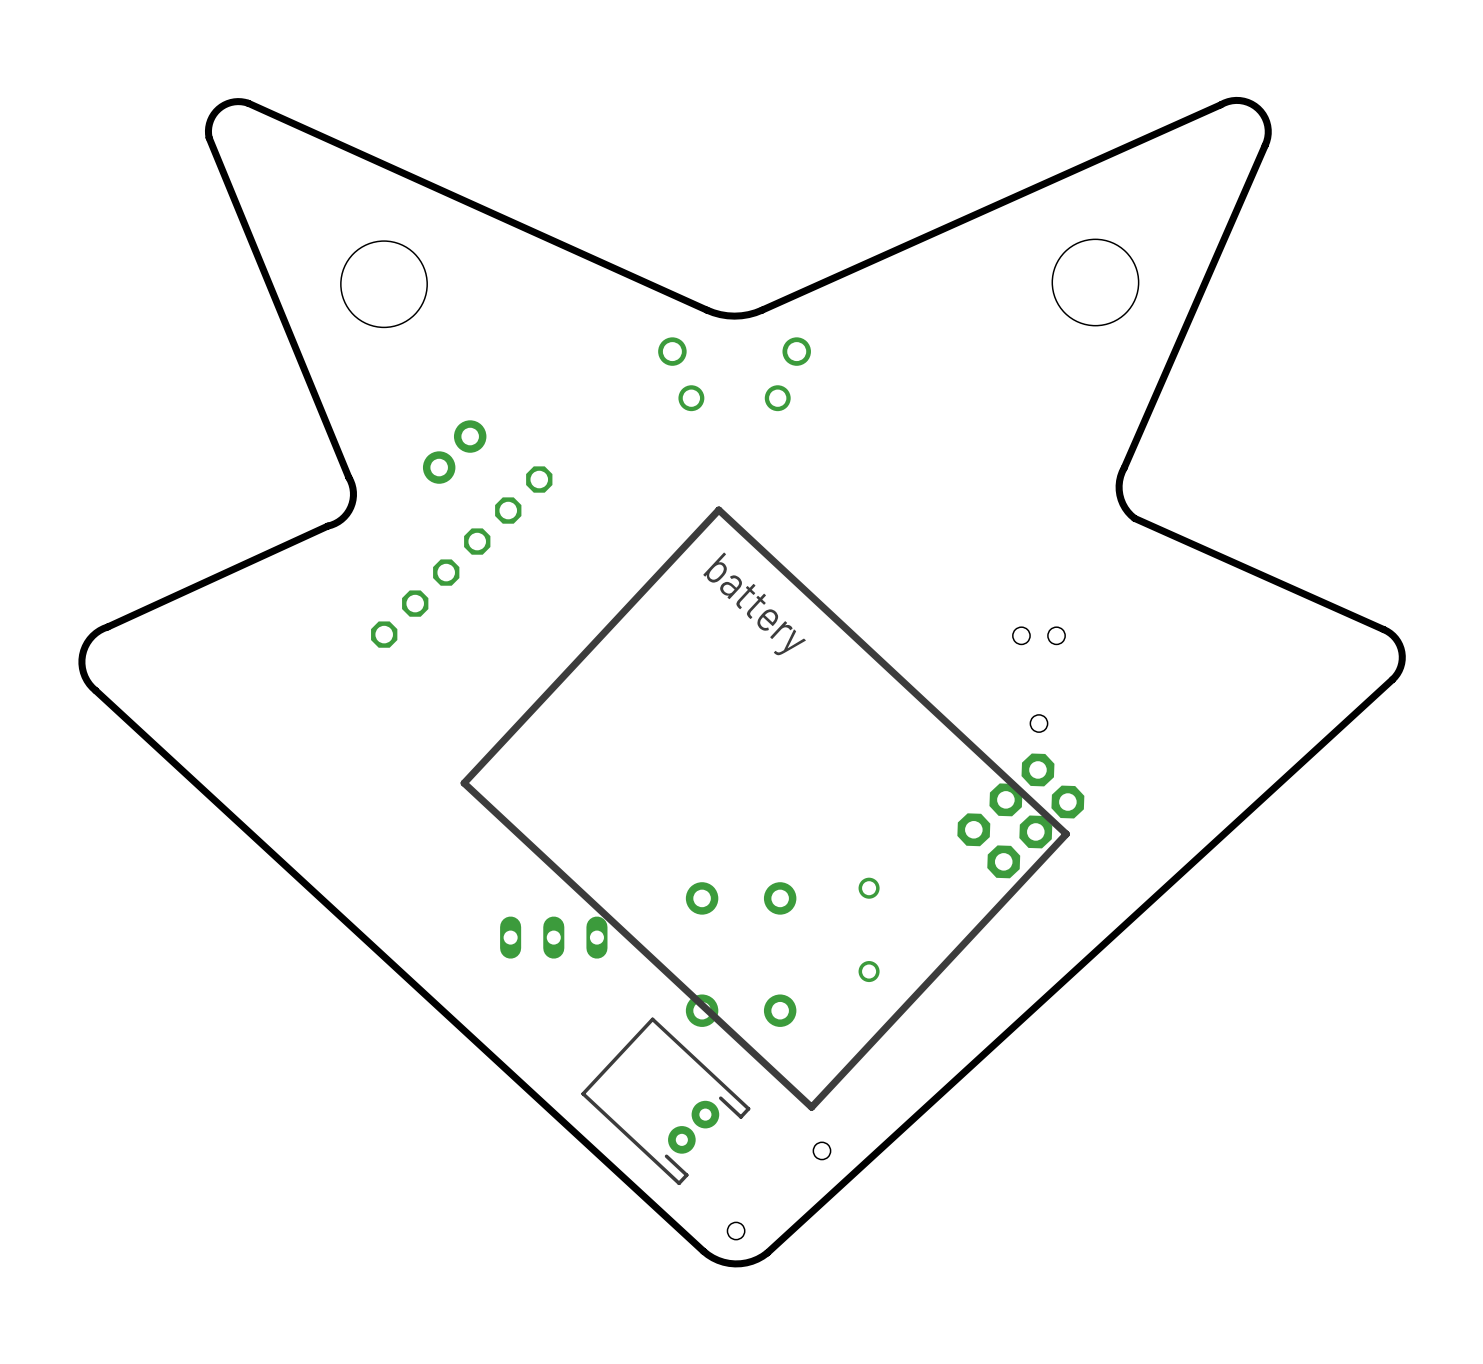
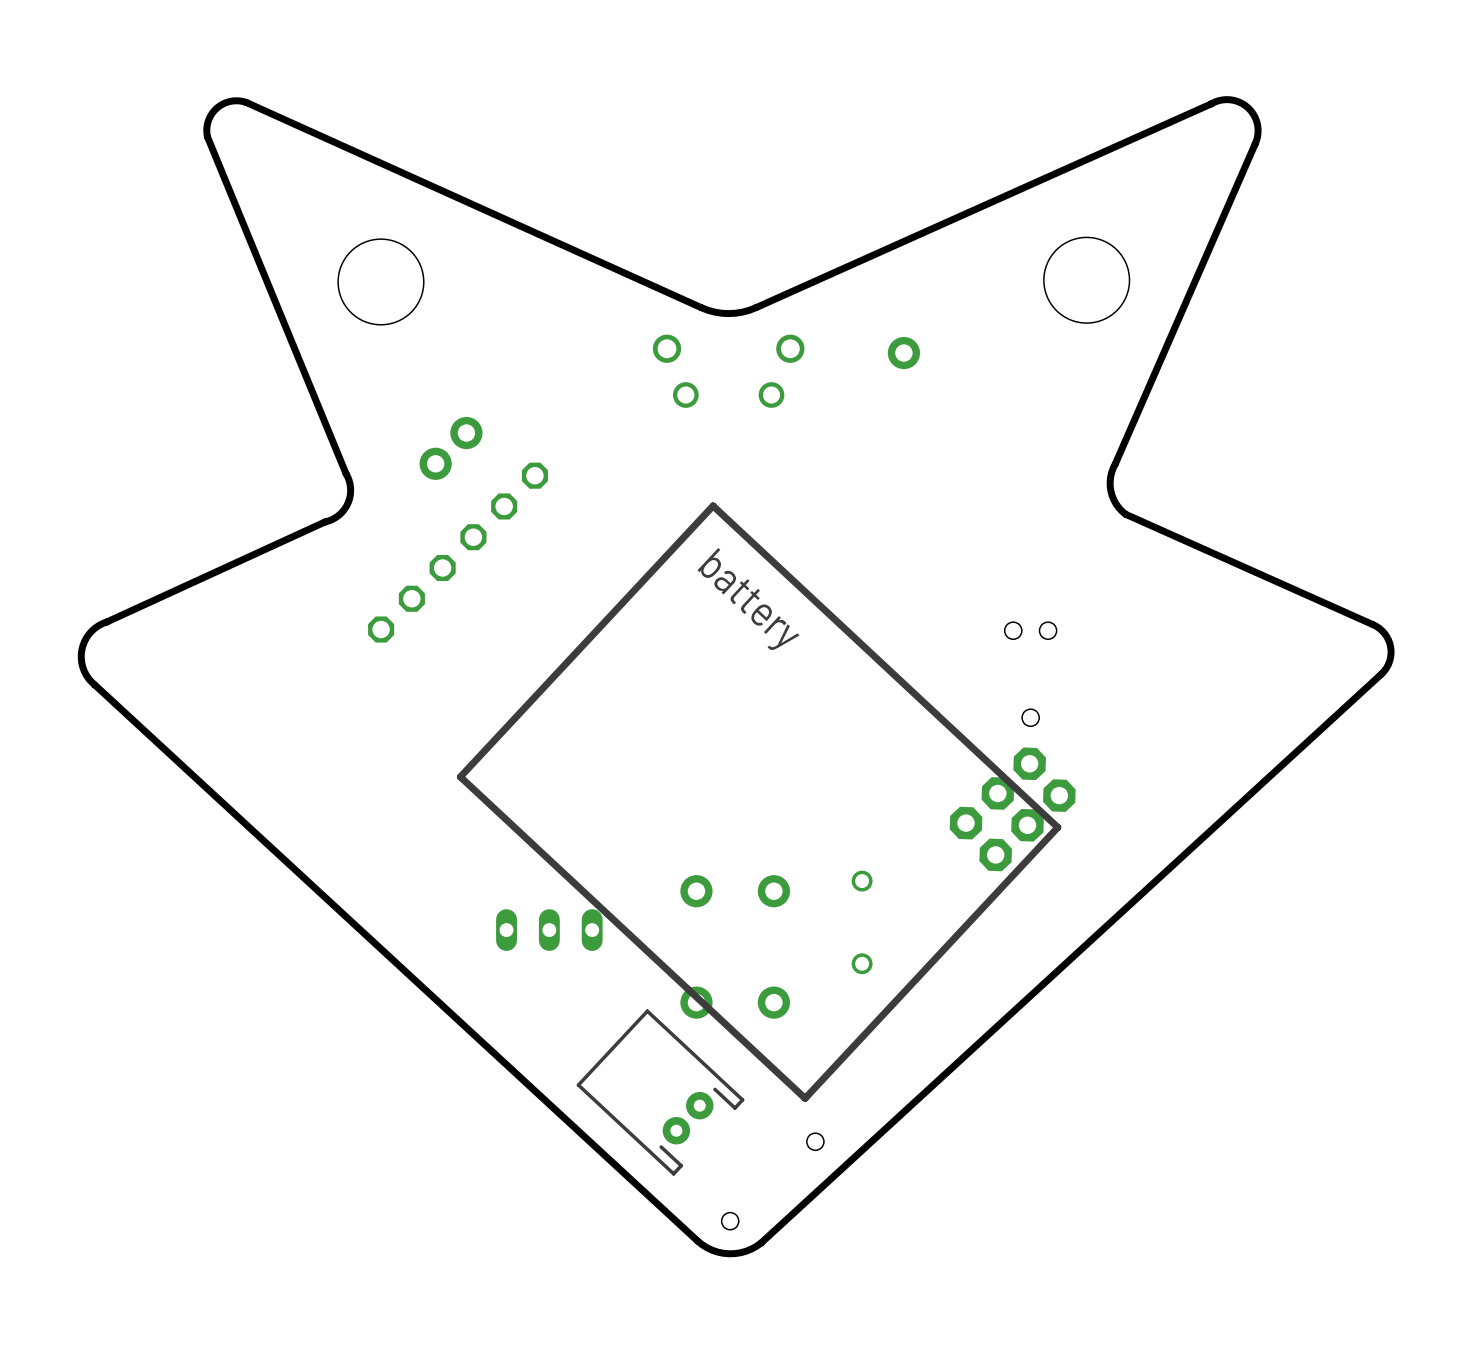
part: none -> (903, 353)

